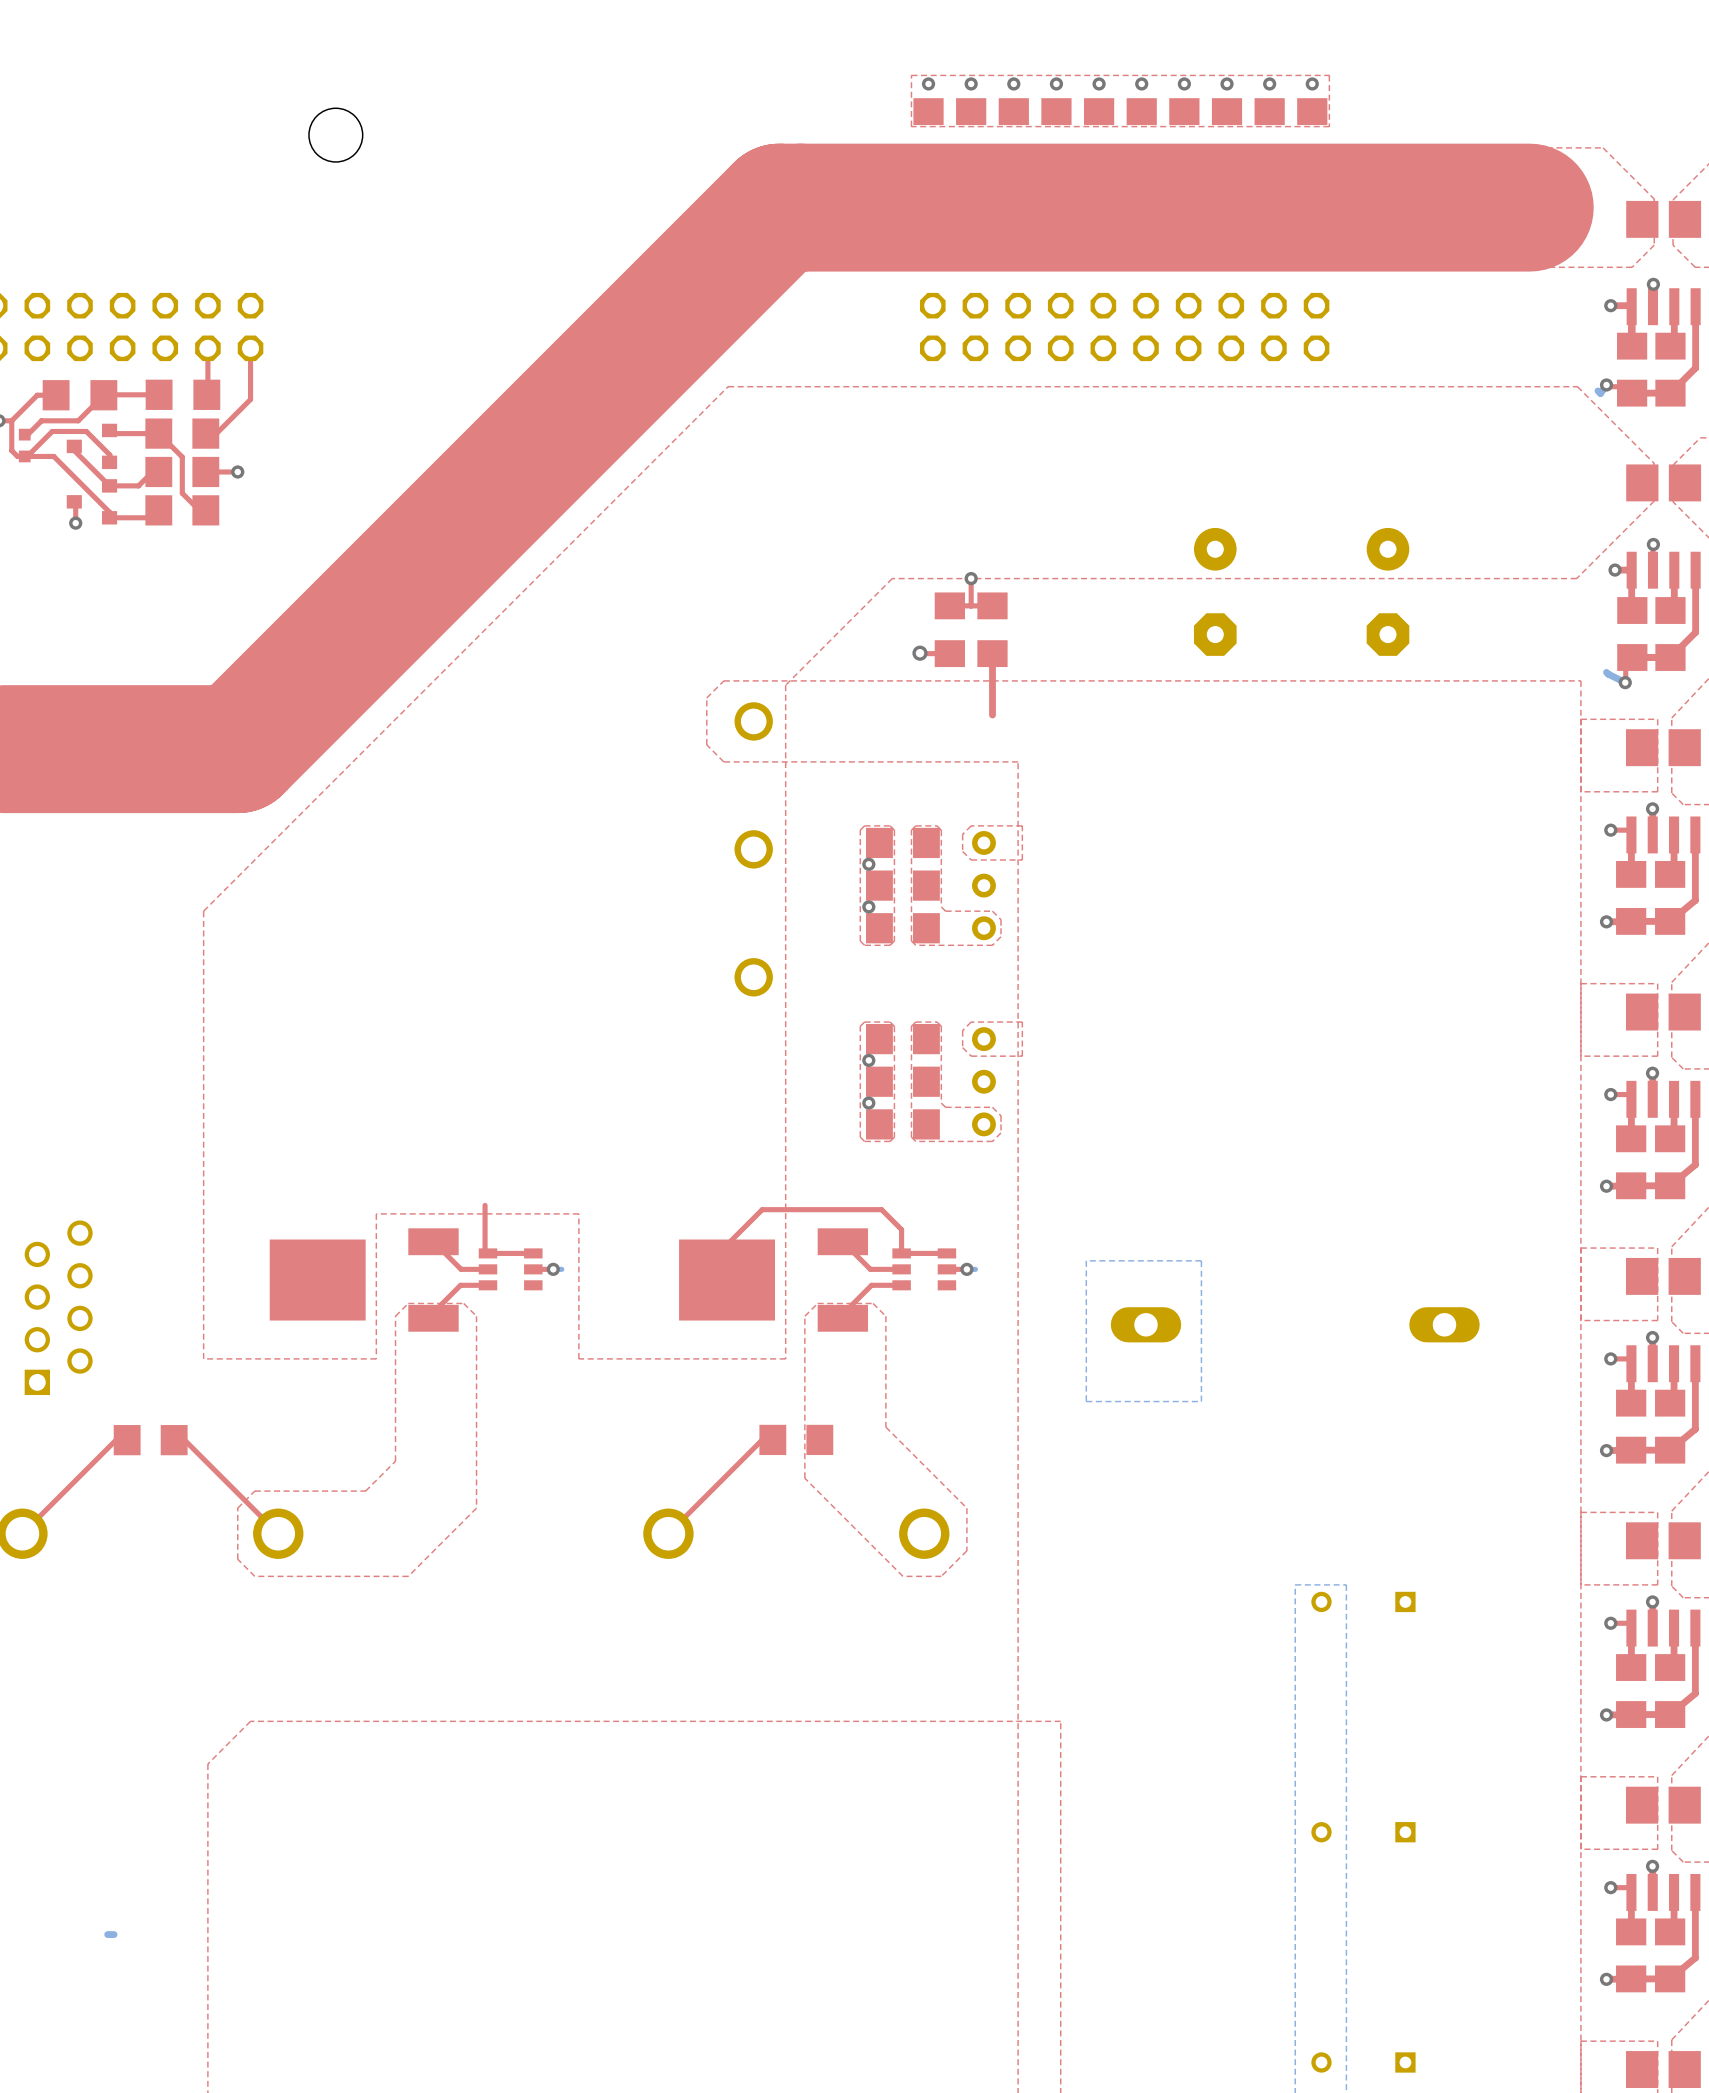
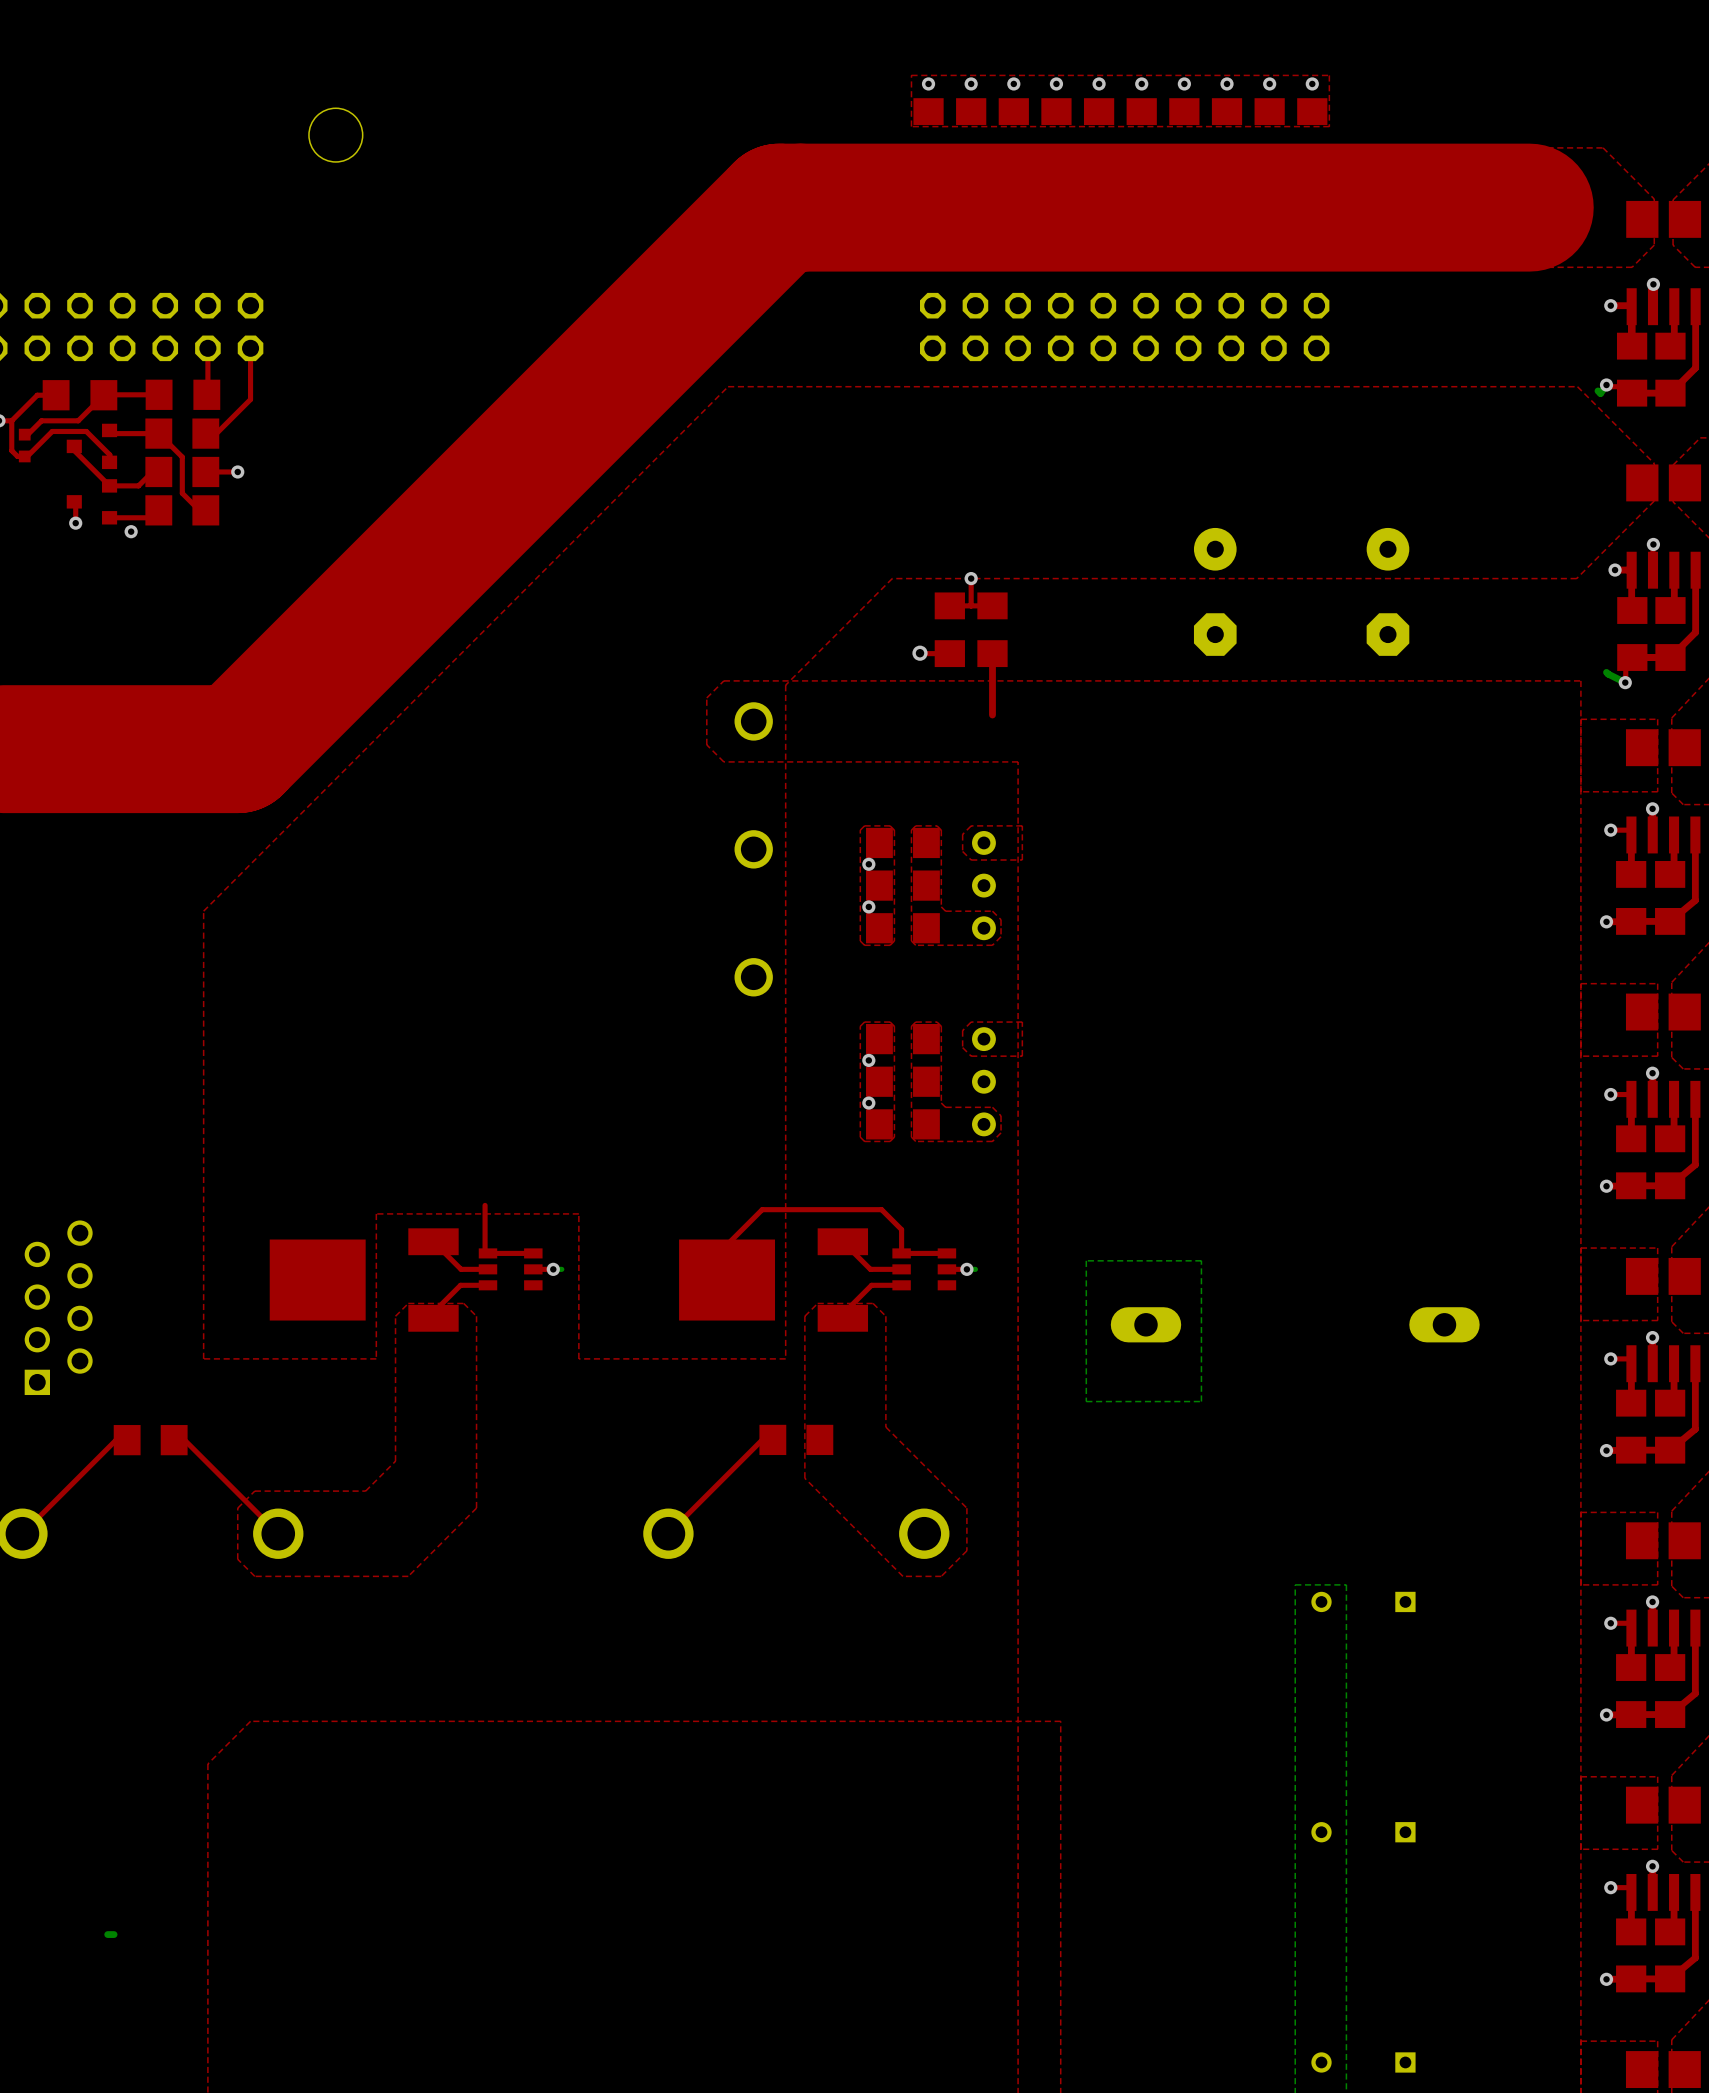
top track: (27, 456) (53, 456) (109, 512) (109, 517) -> none
via: none -> (131, 531)

